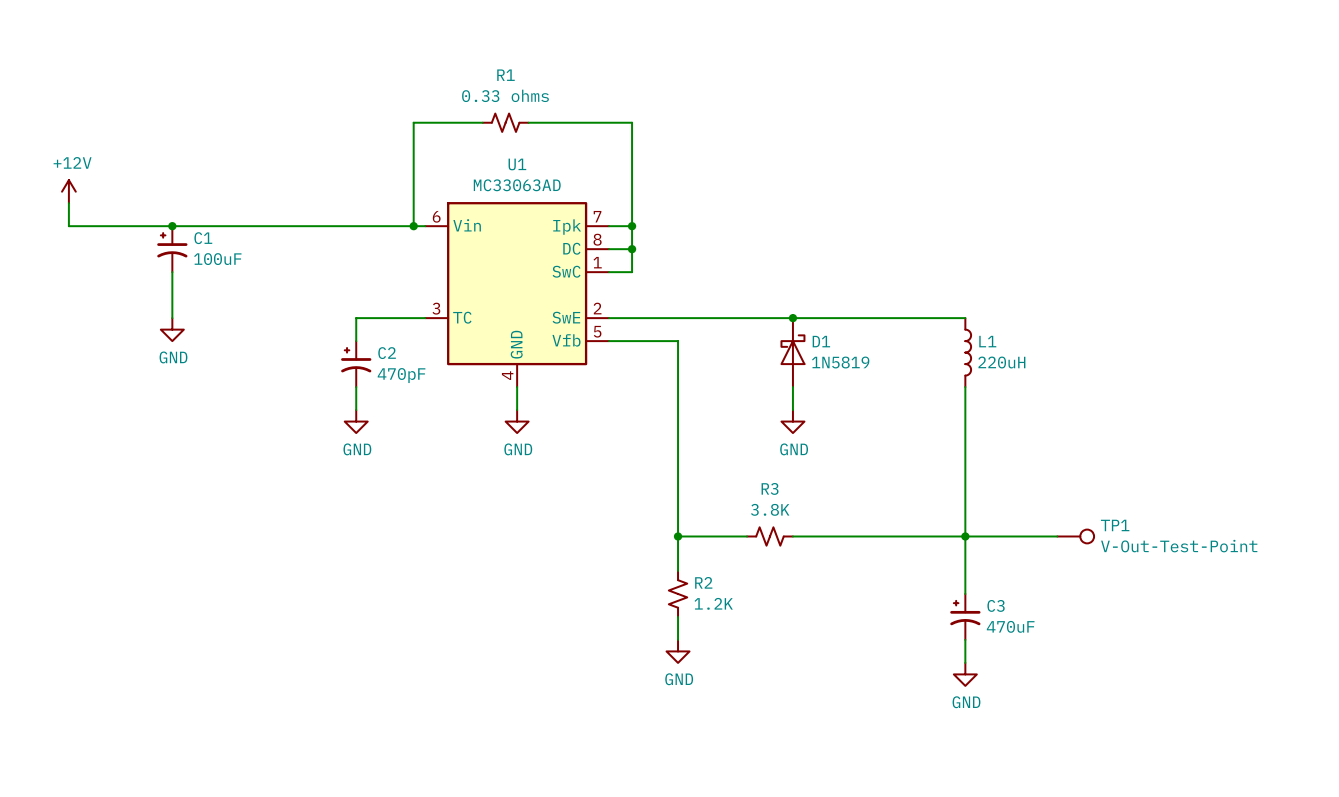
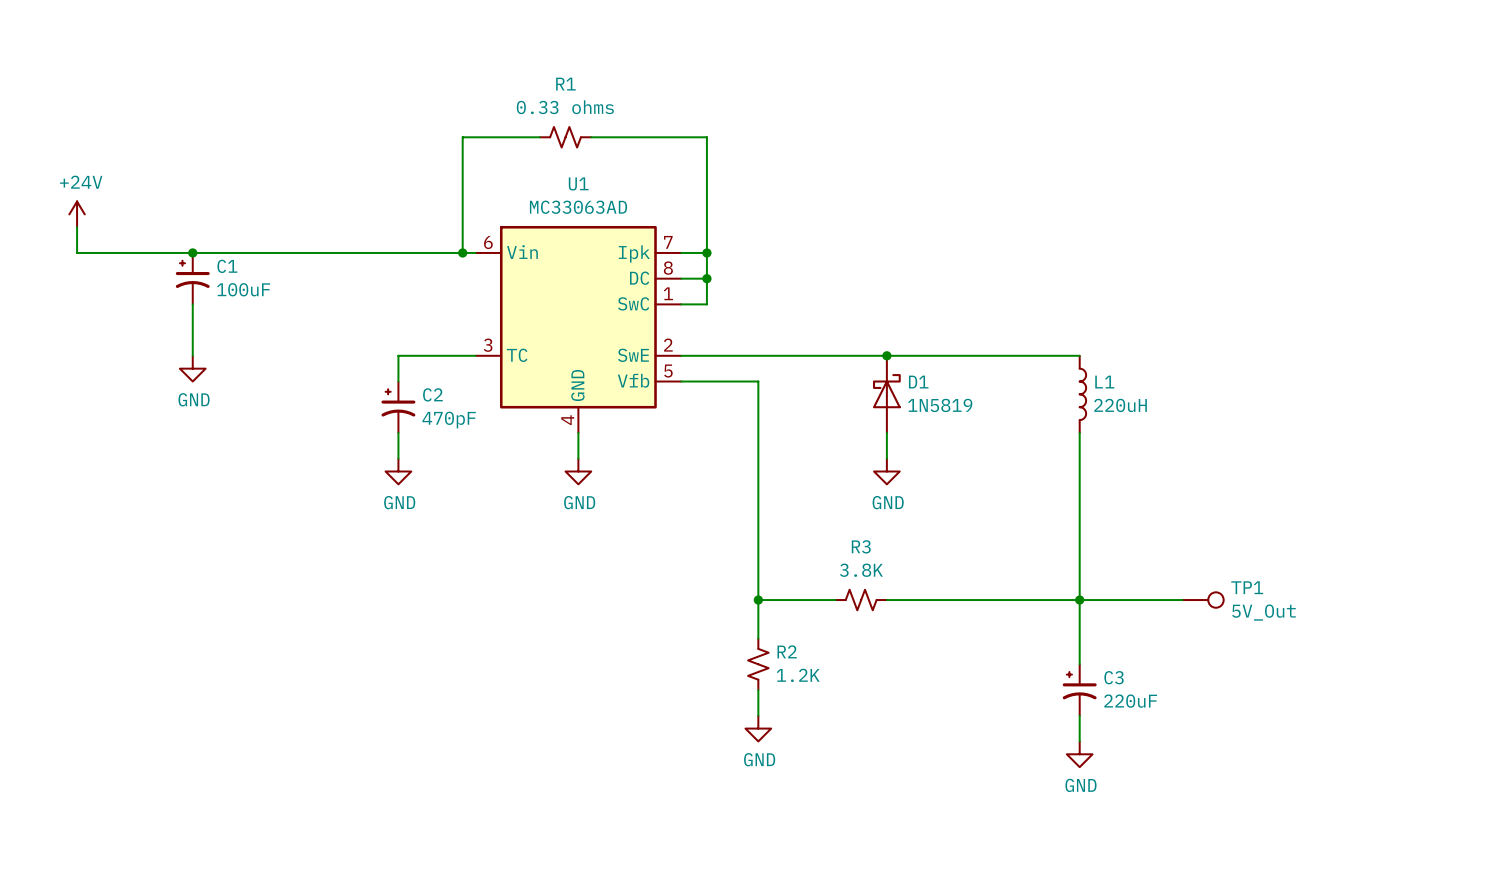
power symbol: +12V (68, 191) -> +24V (77, 214)
TP1 value: V-Out-Test-Point (1179, 546) -> 5V_Out (1264, 612)
C3 value: 470uF (1010, 626) -> 220uF (1130, 701)

